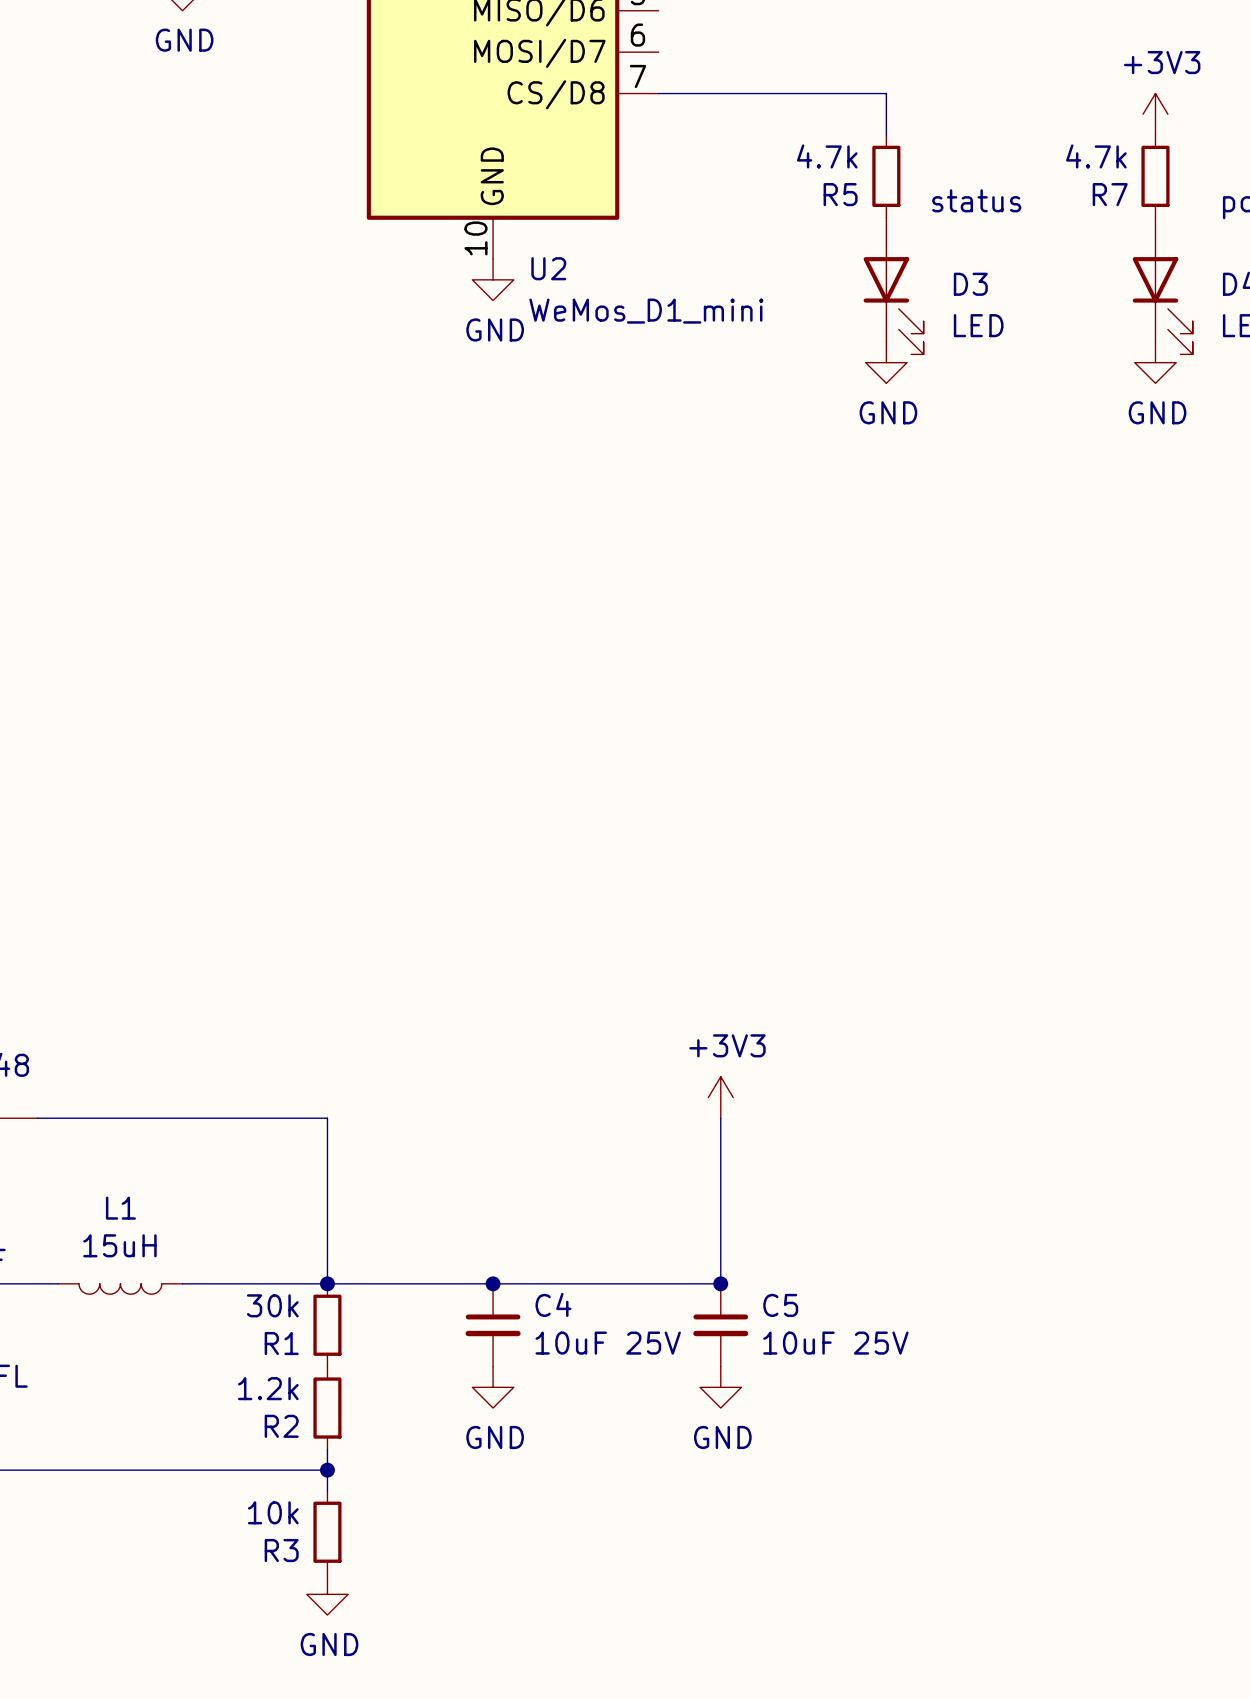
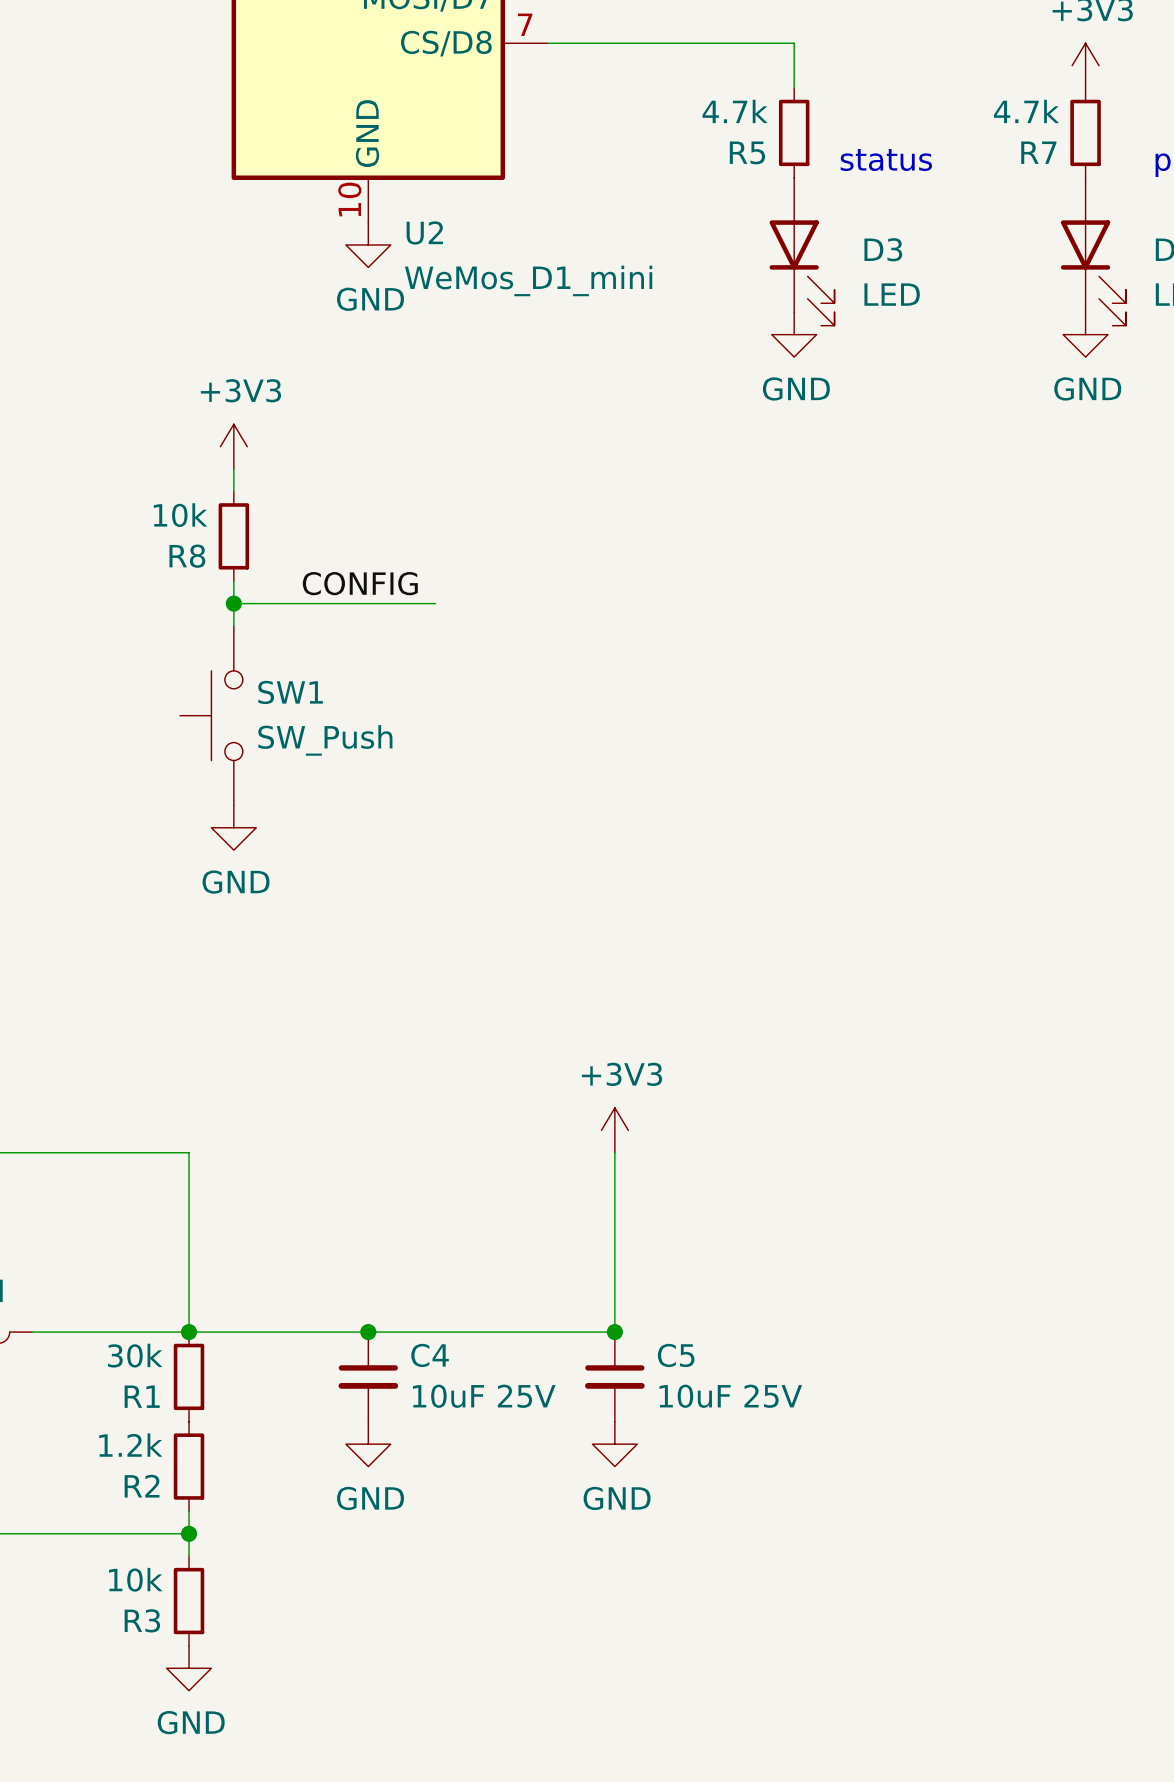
power symbol: none -> +3V3 (233, 446)
wire: none -> (233, 469) (233, 491)
R8: none -> 10k (233, 536)
wire: none -> (233, 581) (233, 626)
label: none -> CONFIG (360, 583)
wire: none -> (233, 603) (435, 603)
junction: none -> (233, 603)
SW1: none -> SW_Push (211, 715)
power symbol: none -> GND (233, 827)

